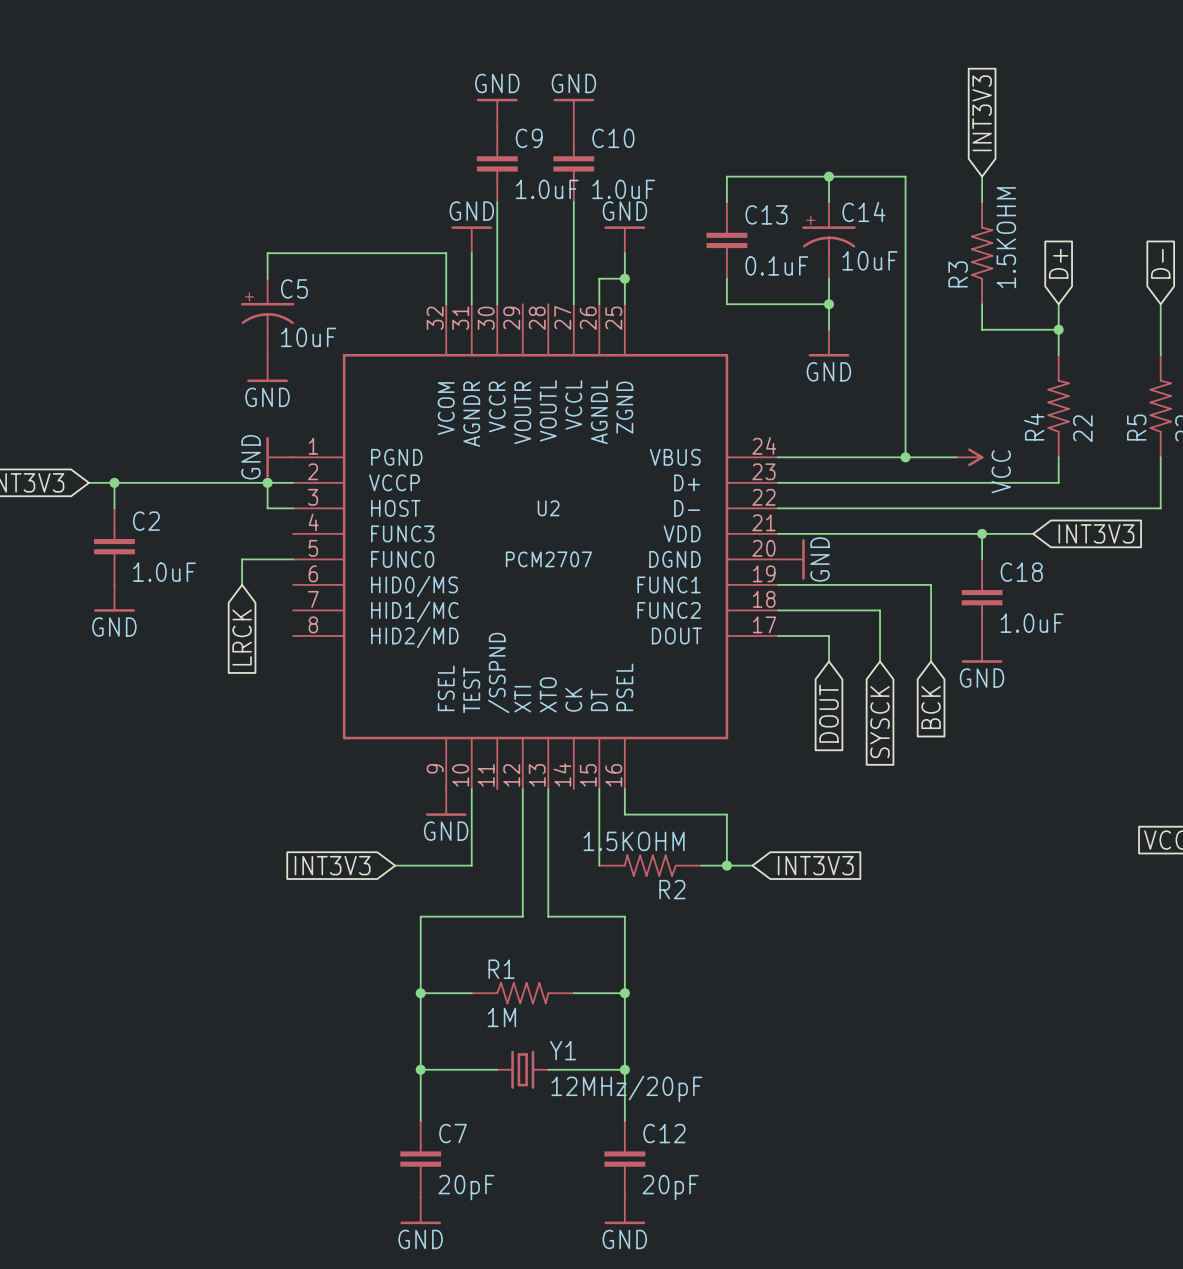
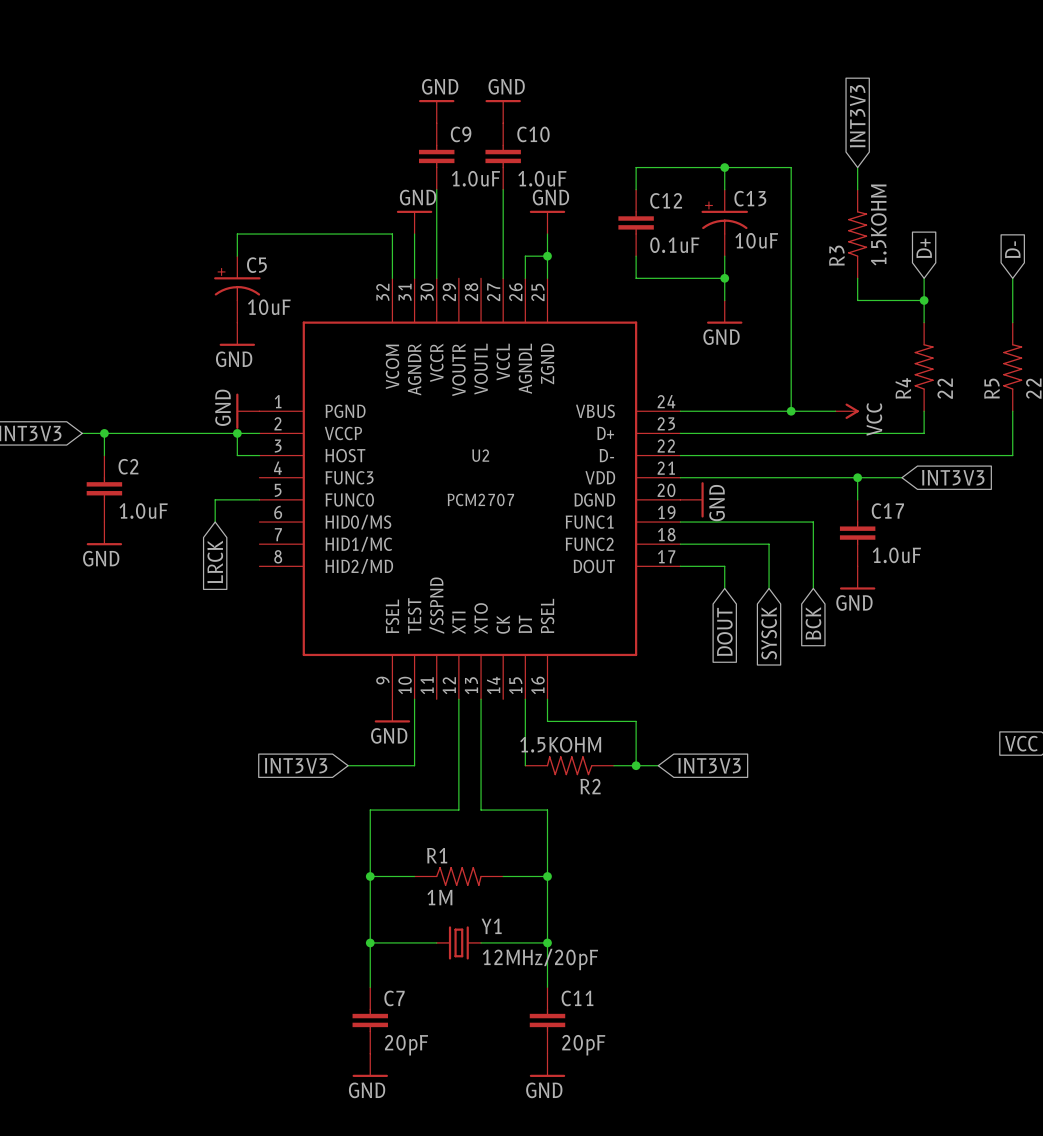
C14 name: C14 (863, 211) -> C13 (750, 198)
C13 name: C13 (766, 214) -> C12 (666, 200)
C18 name: C18 (1021, 572) -> C17 (887, 511)
C12 name: C12 (664, 1133) -> C11 (577, 998)

